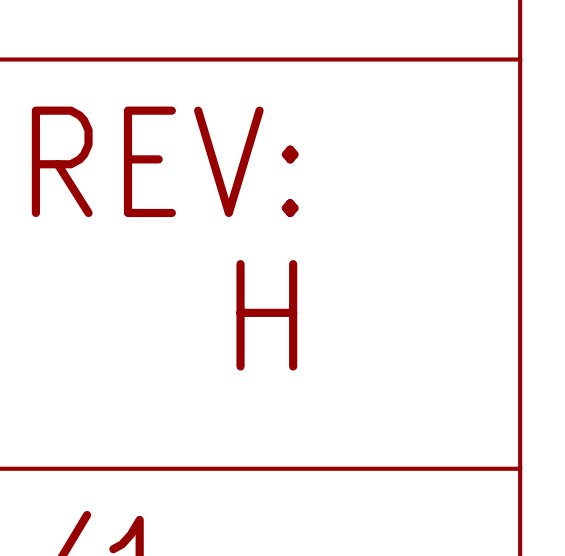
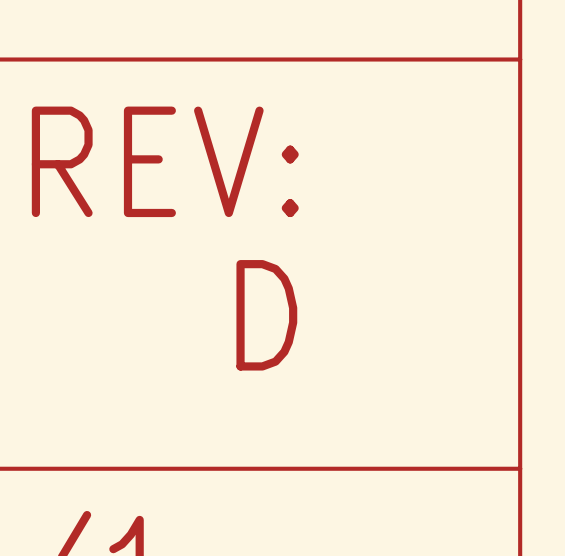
text: H (266, 315) -> D (266, 315)

